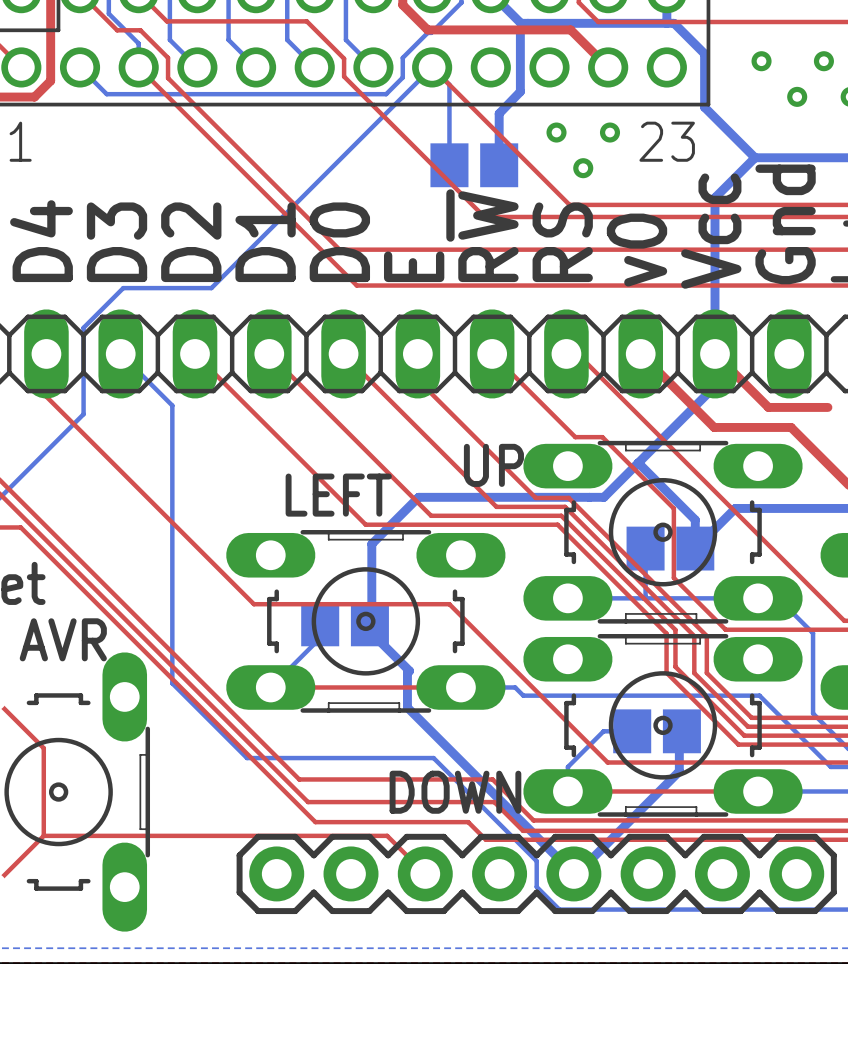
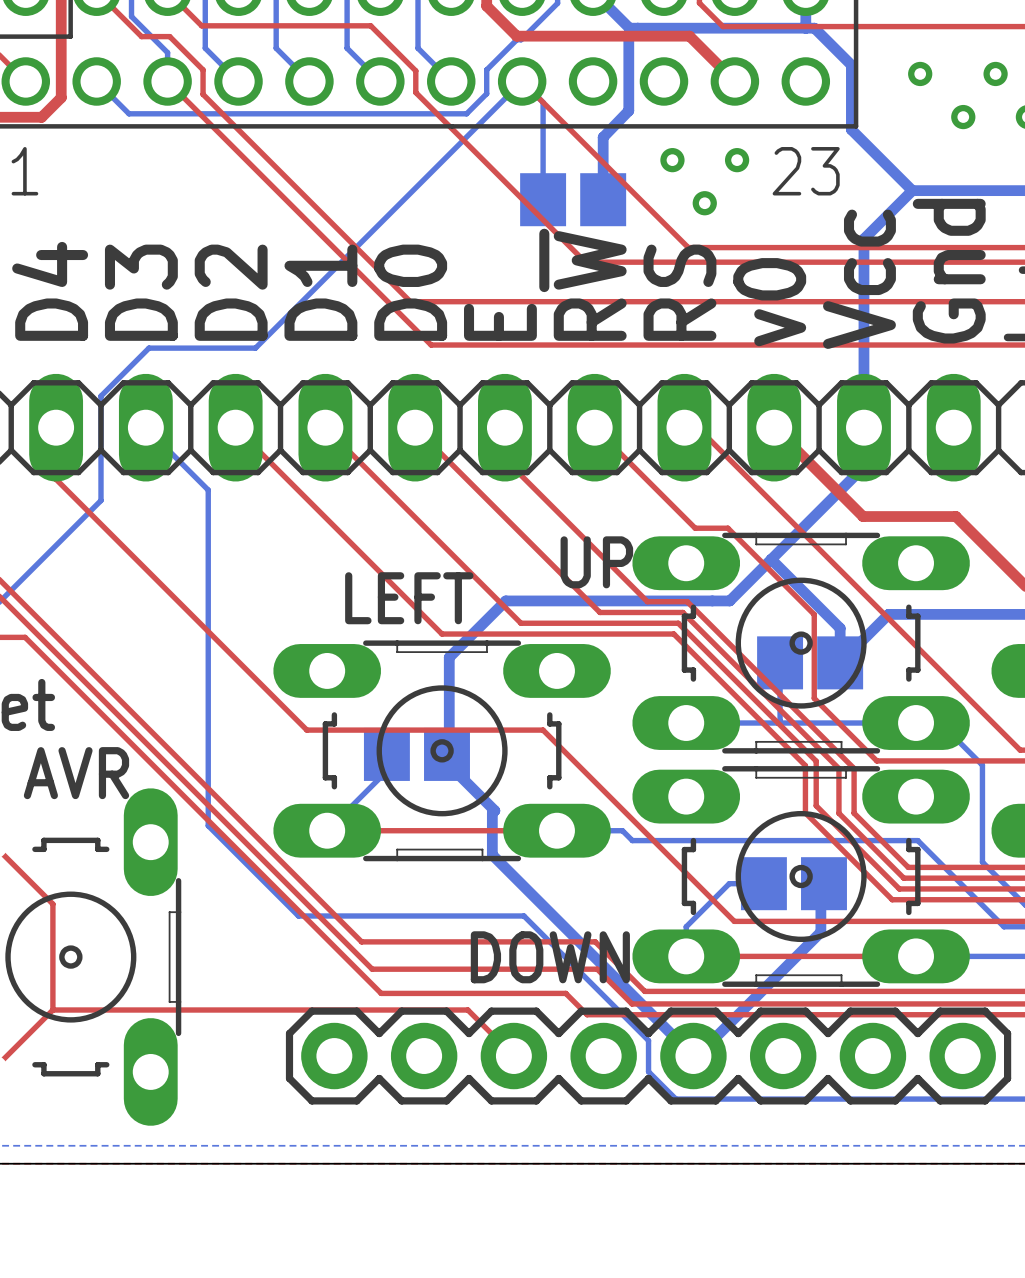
top track: (715, 353) (768, 407) (827, 407) -> none

